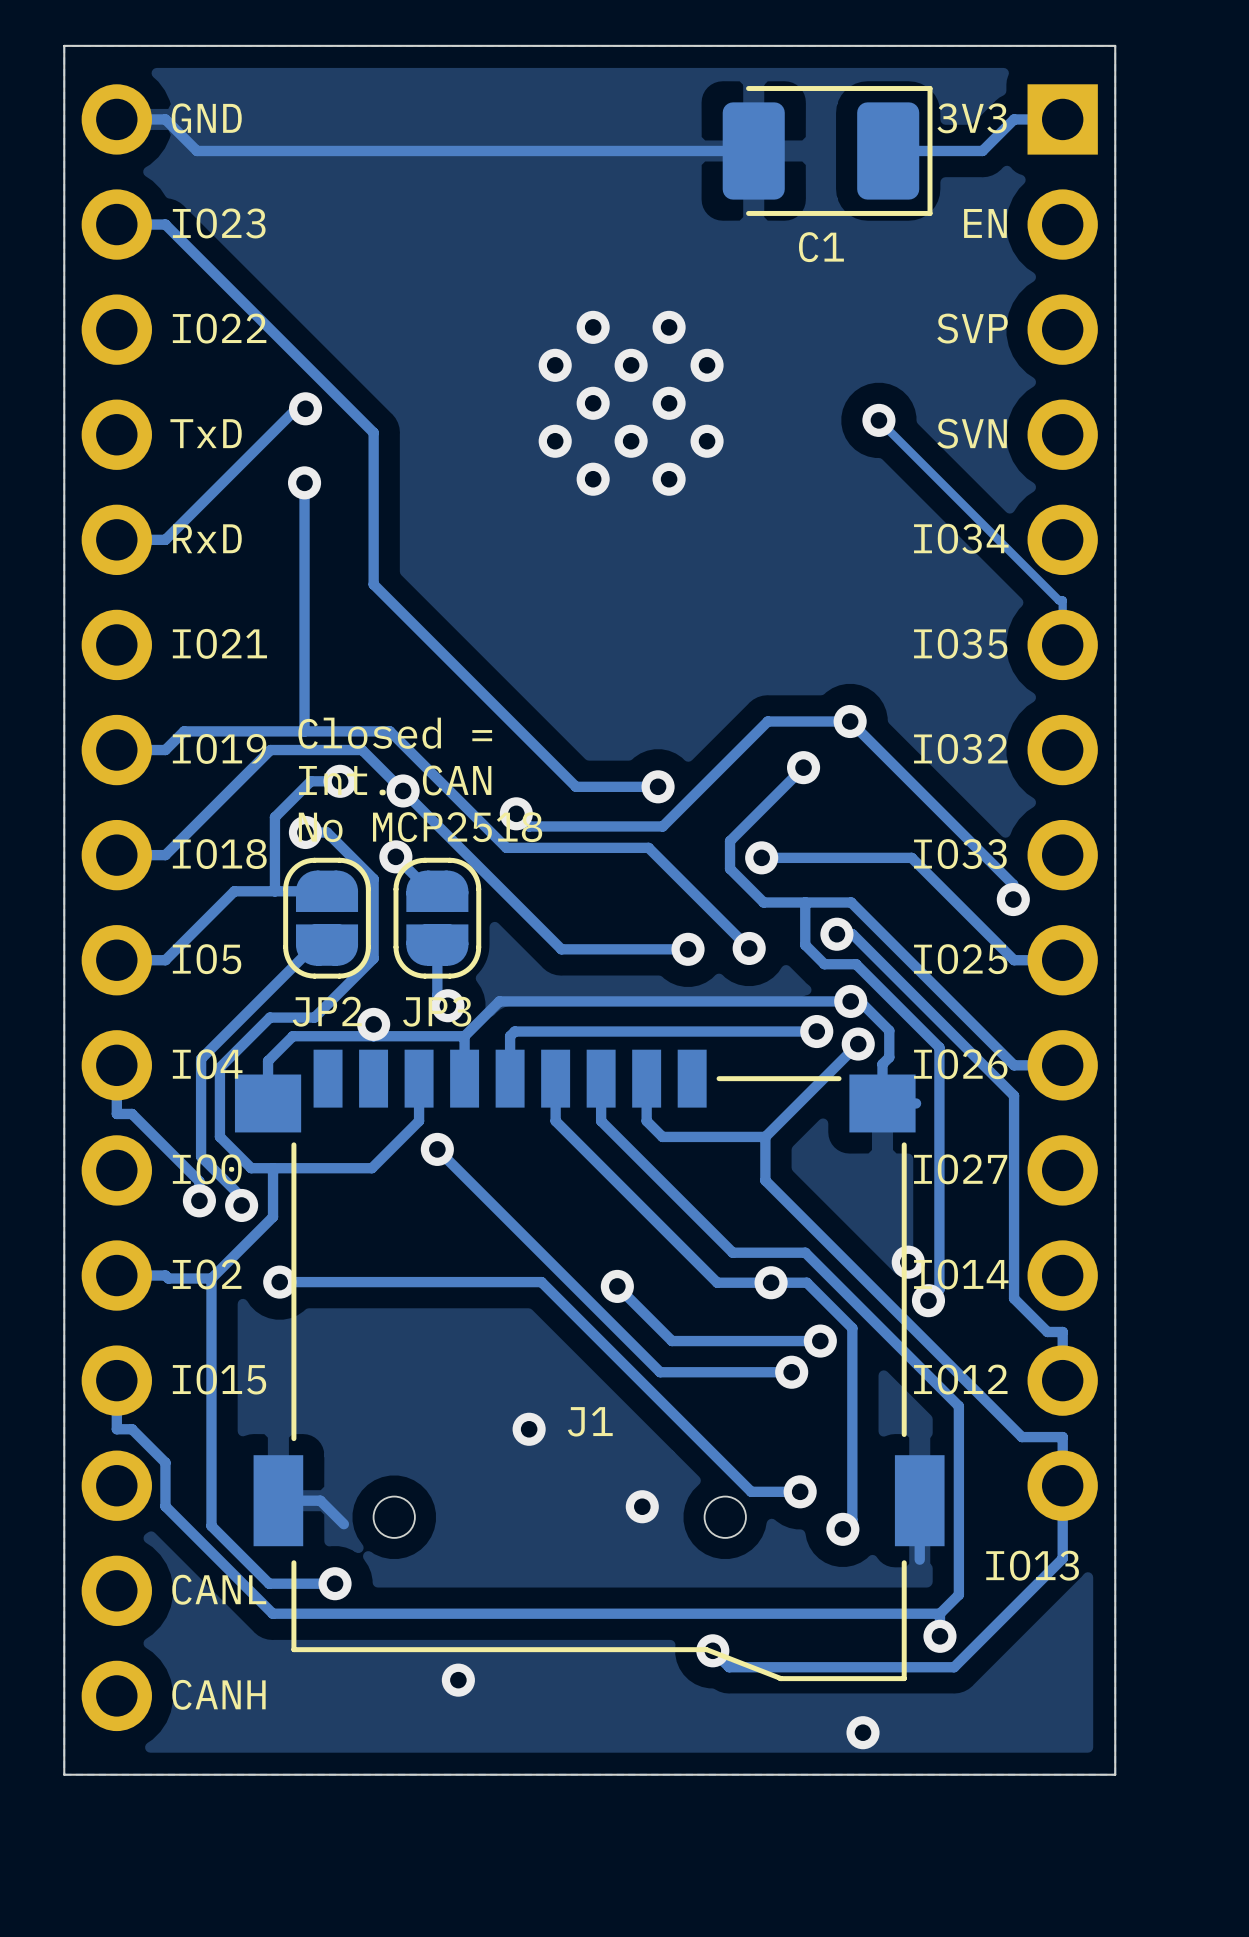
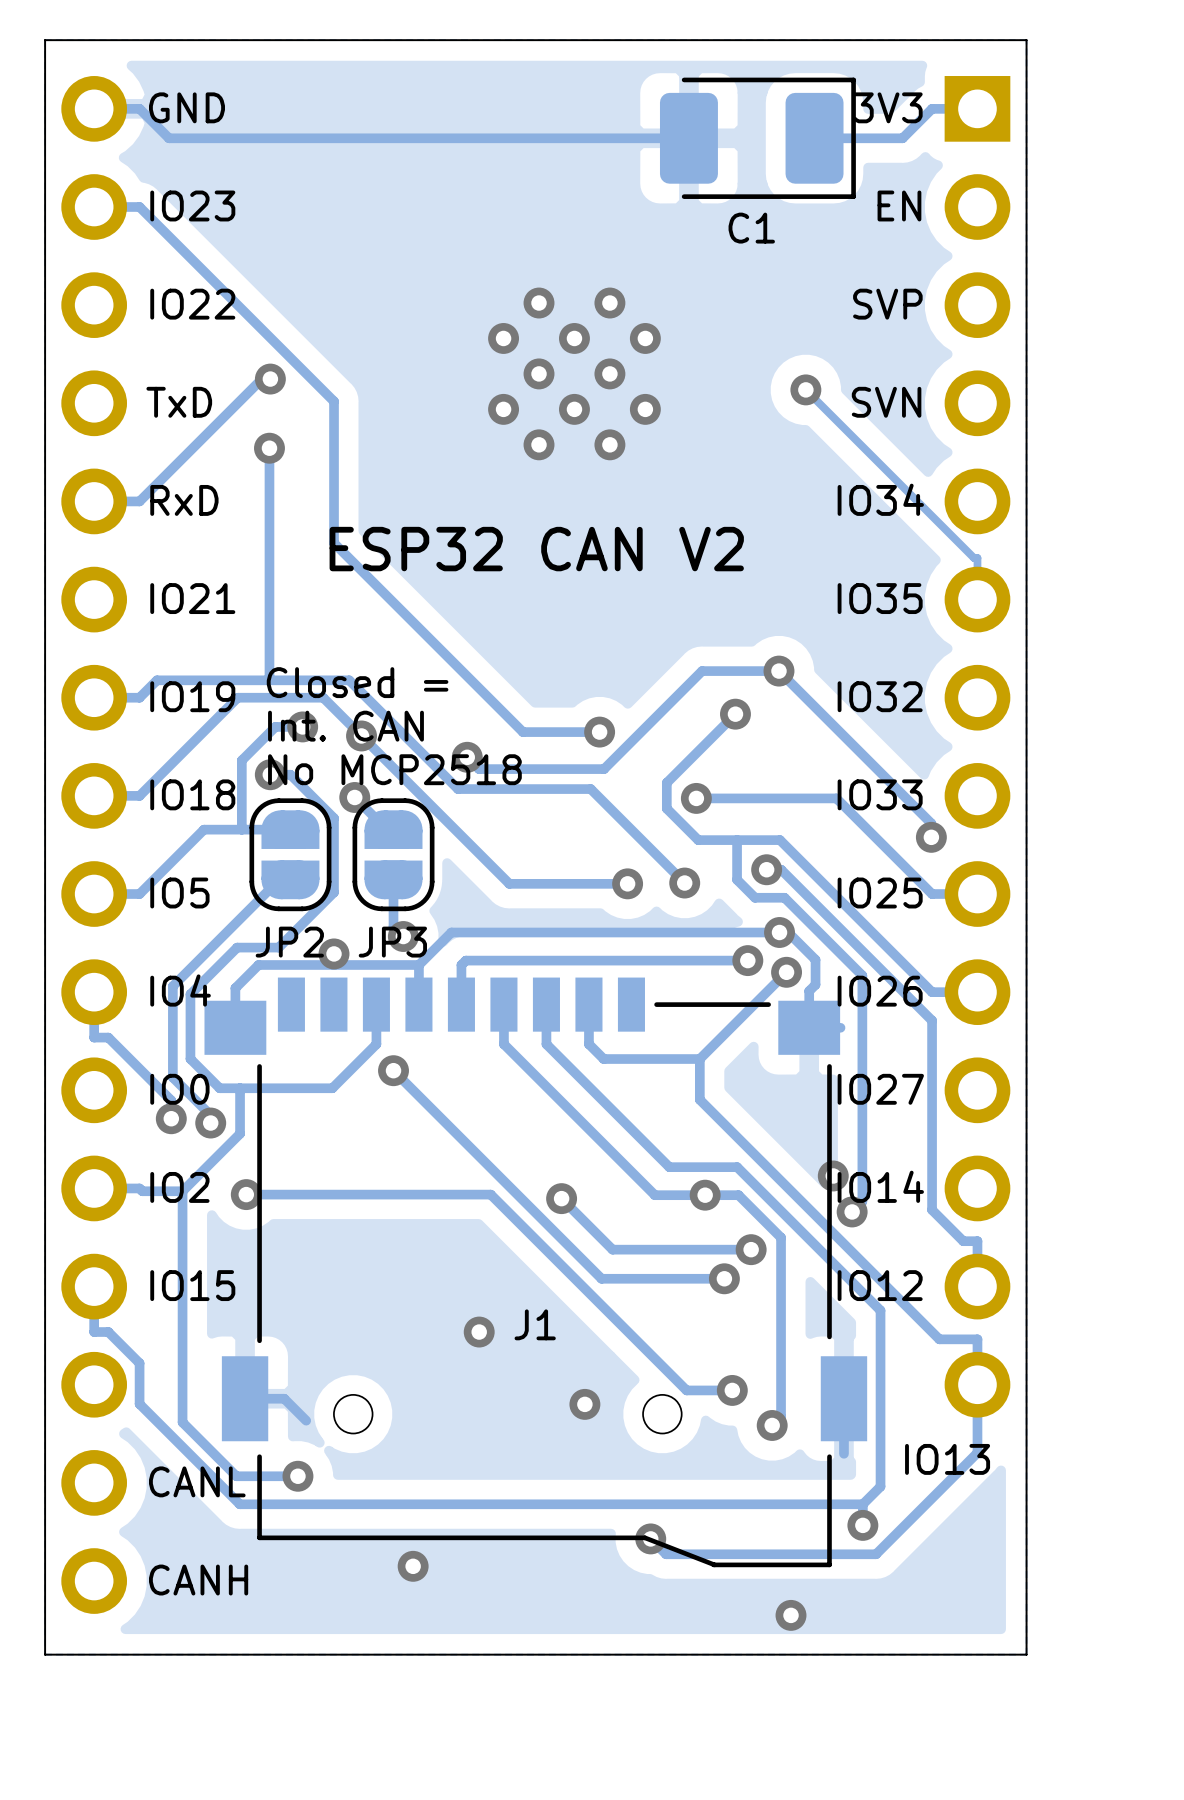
text: none -> ESP32 CAN V2 (536, 549)

